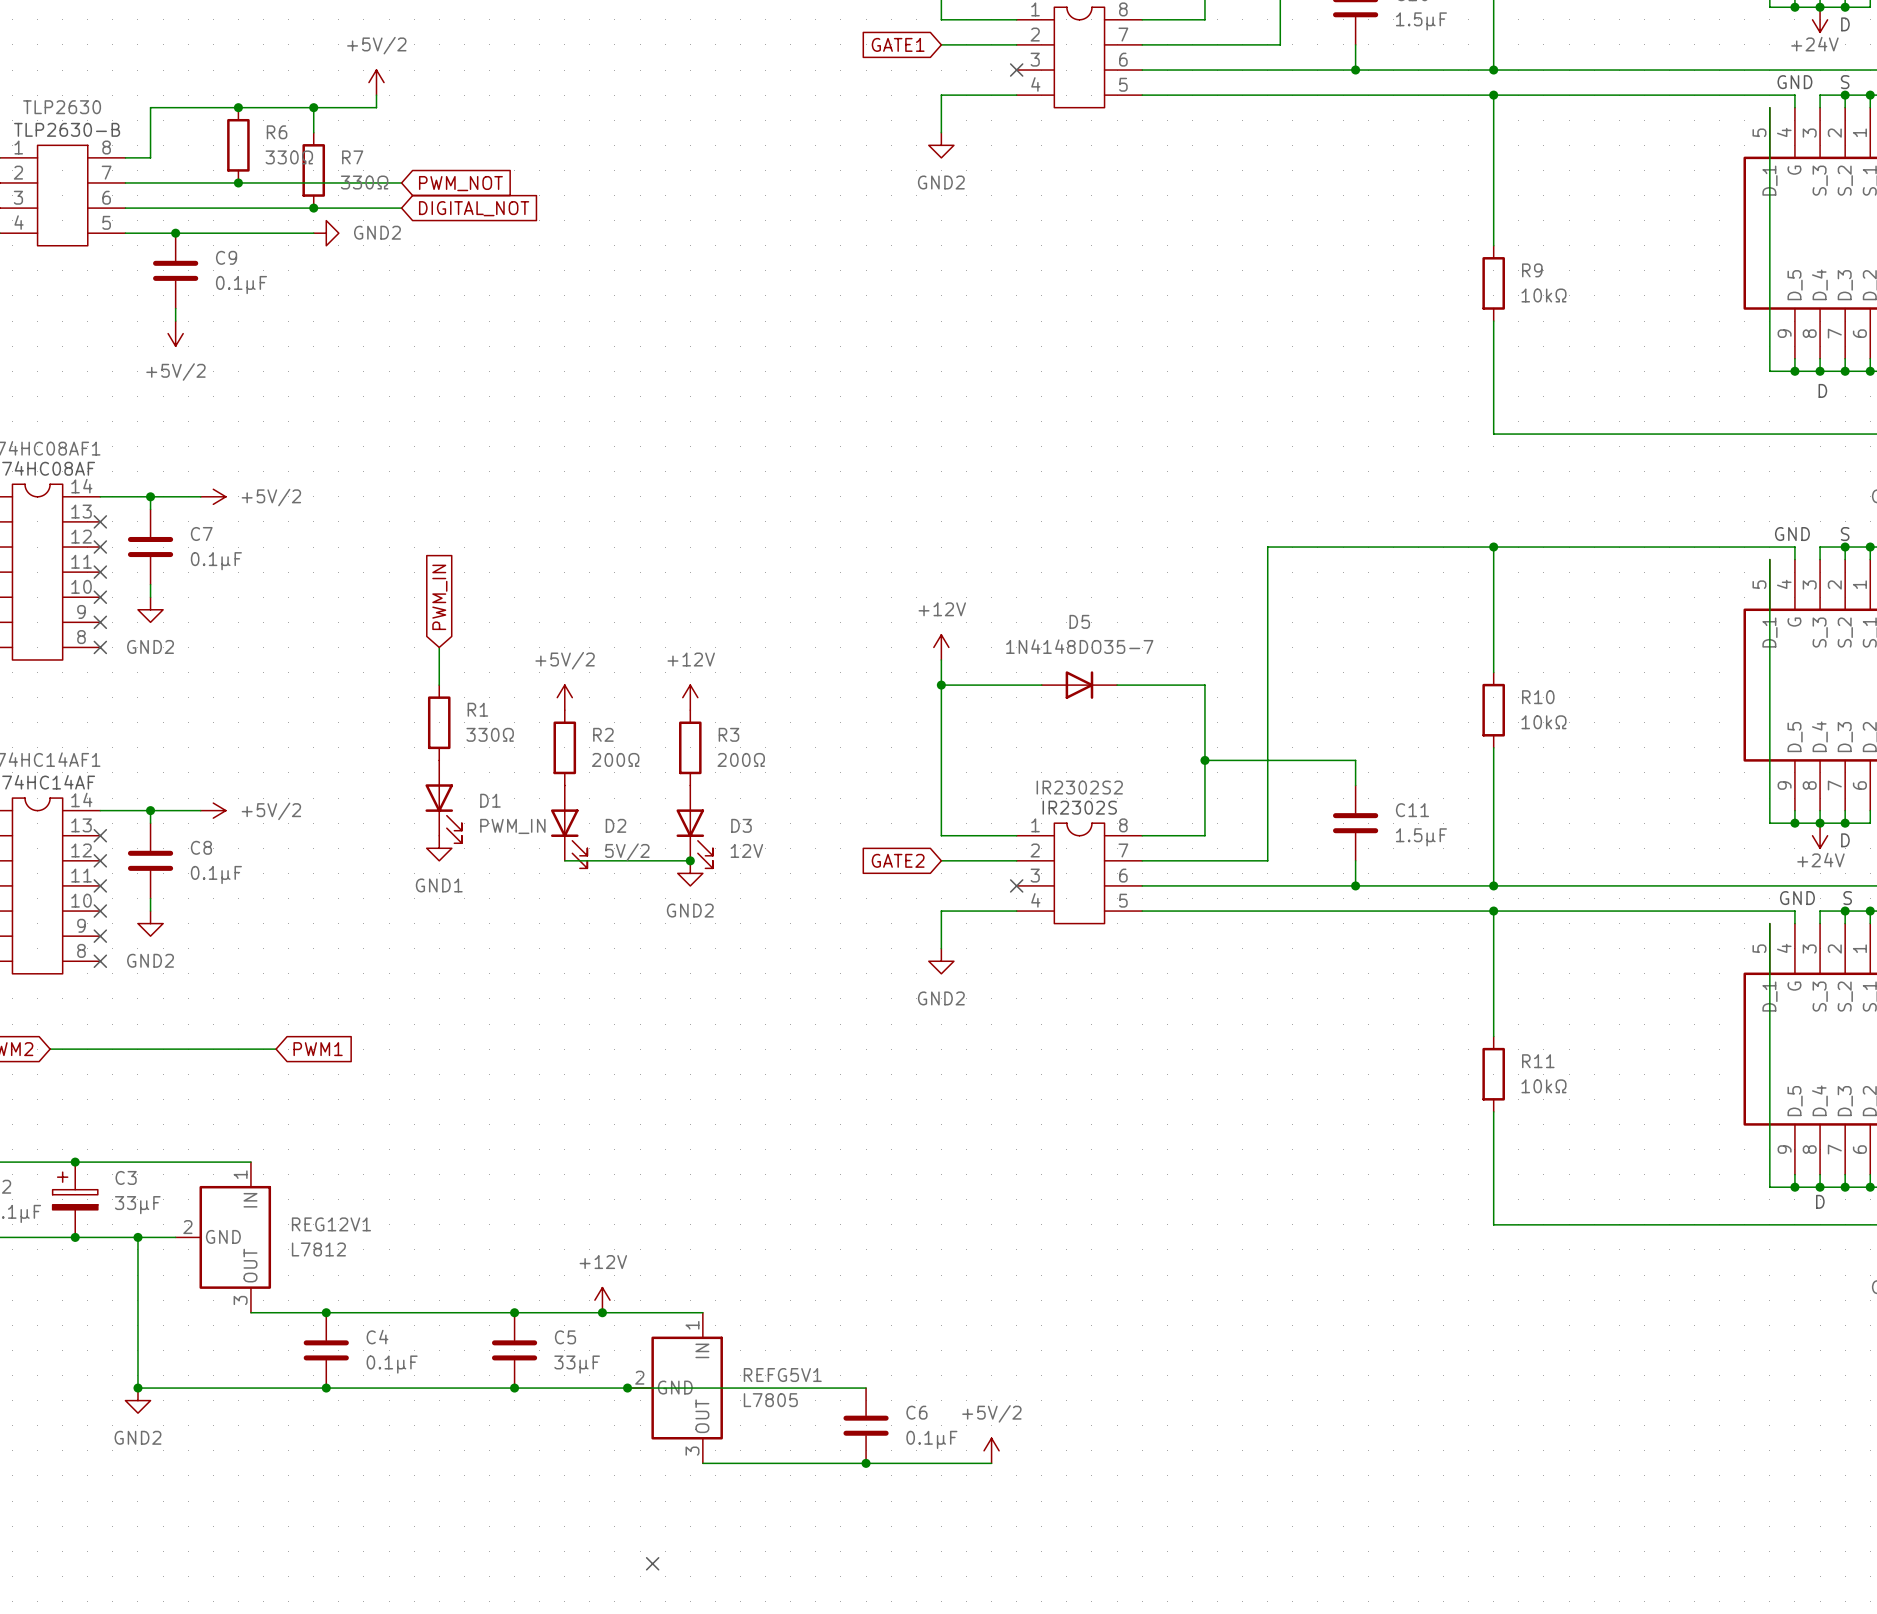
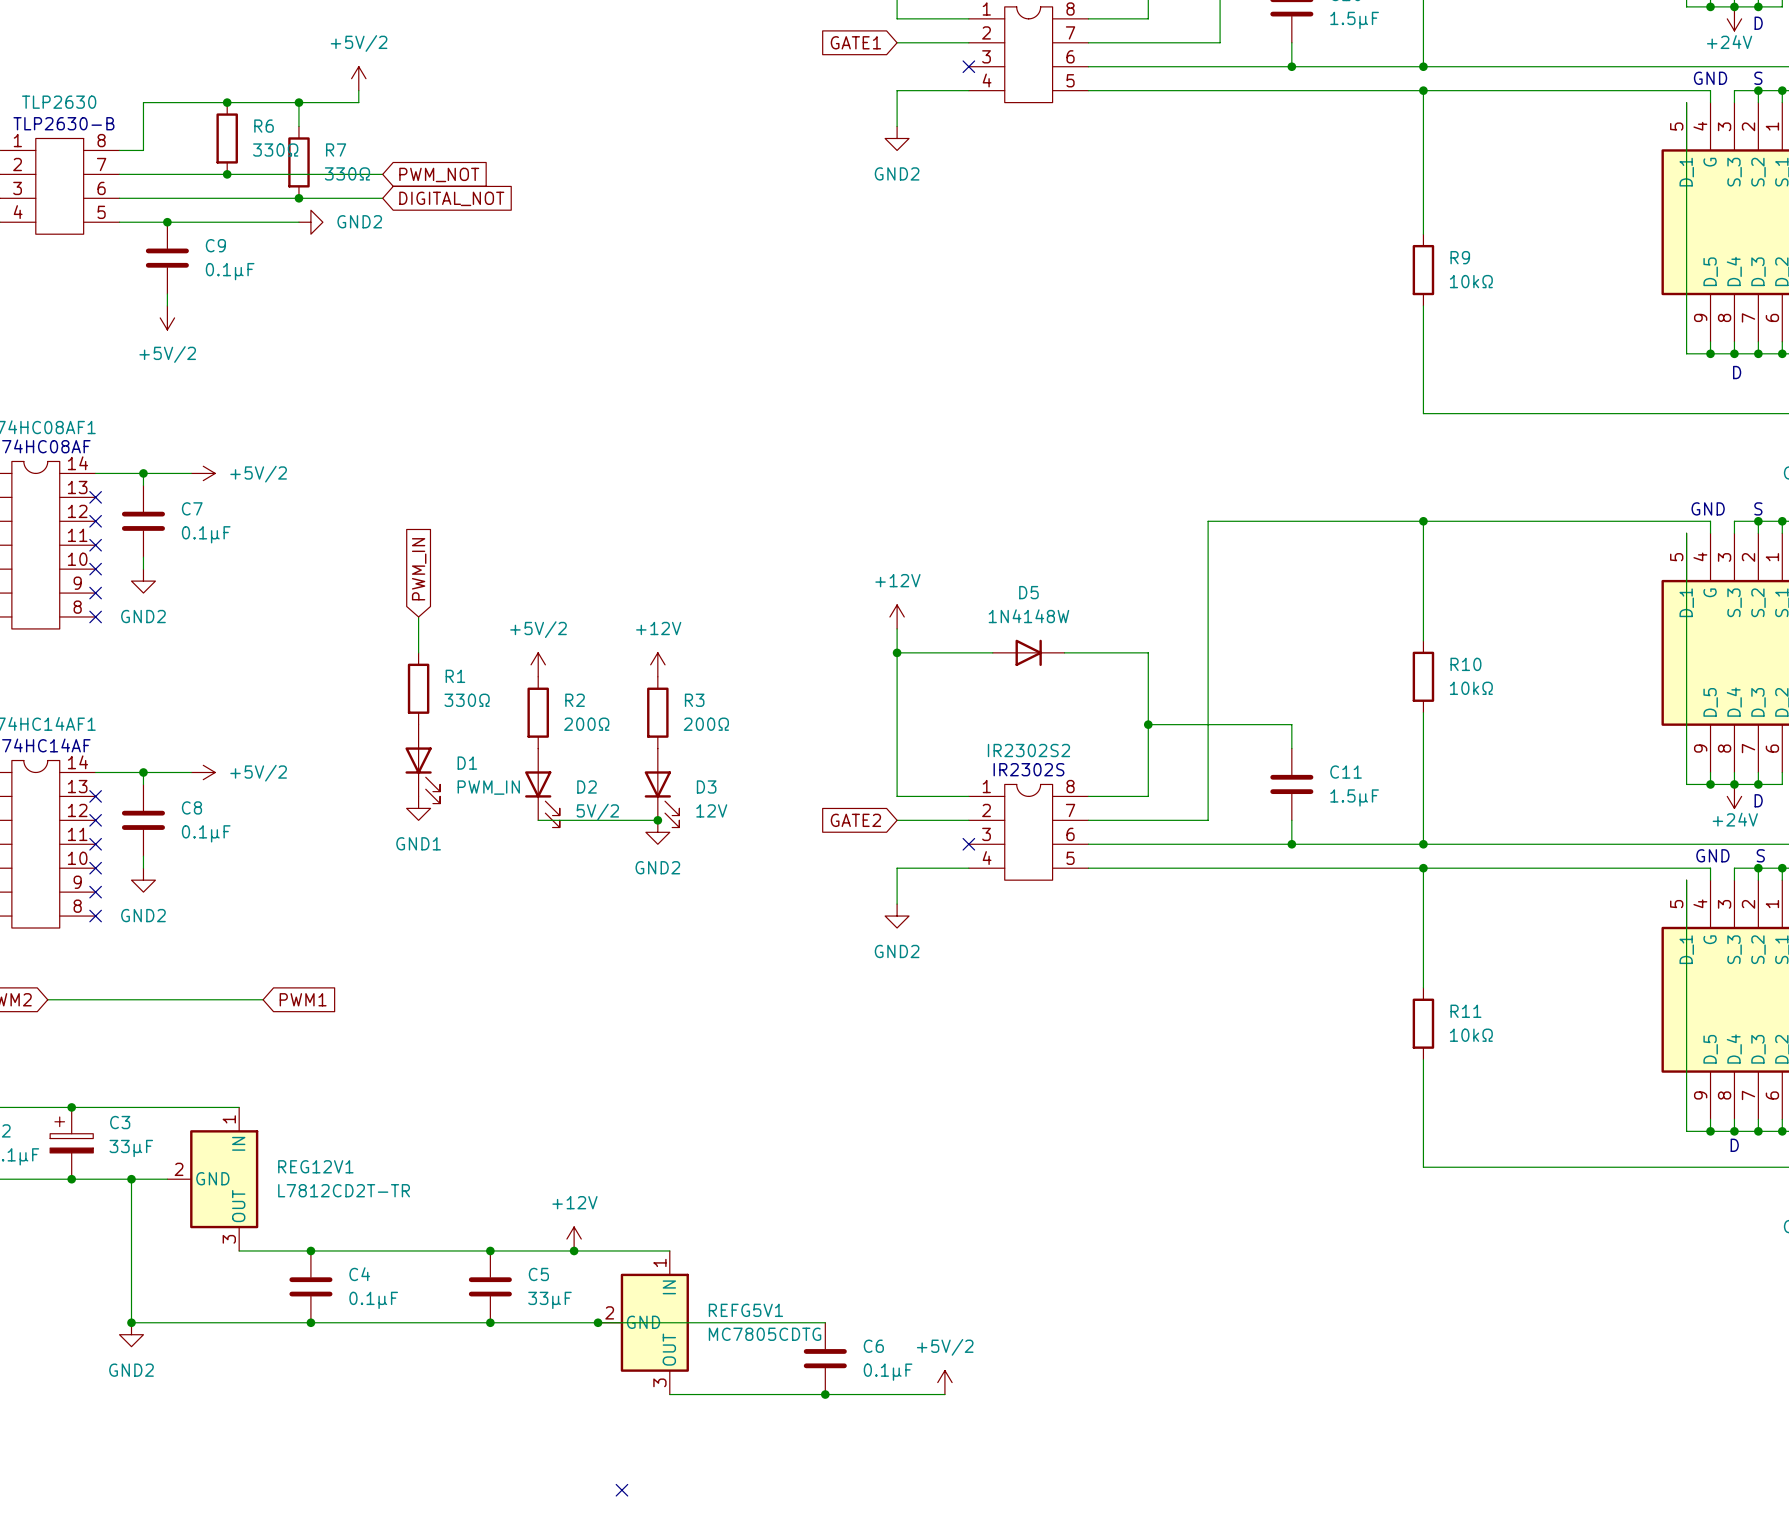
D5 value: 1N4148DO35-7 (1079, 646) -> 1N4148W (1028, 616)
REG12V1 value: L7812 (318, 1249) -> L7812CD2T-TR (344, 1190)
REFG5V1 value: L7805 (770, 1400) -> MC7805CDTG (765, 1334)

